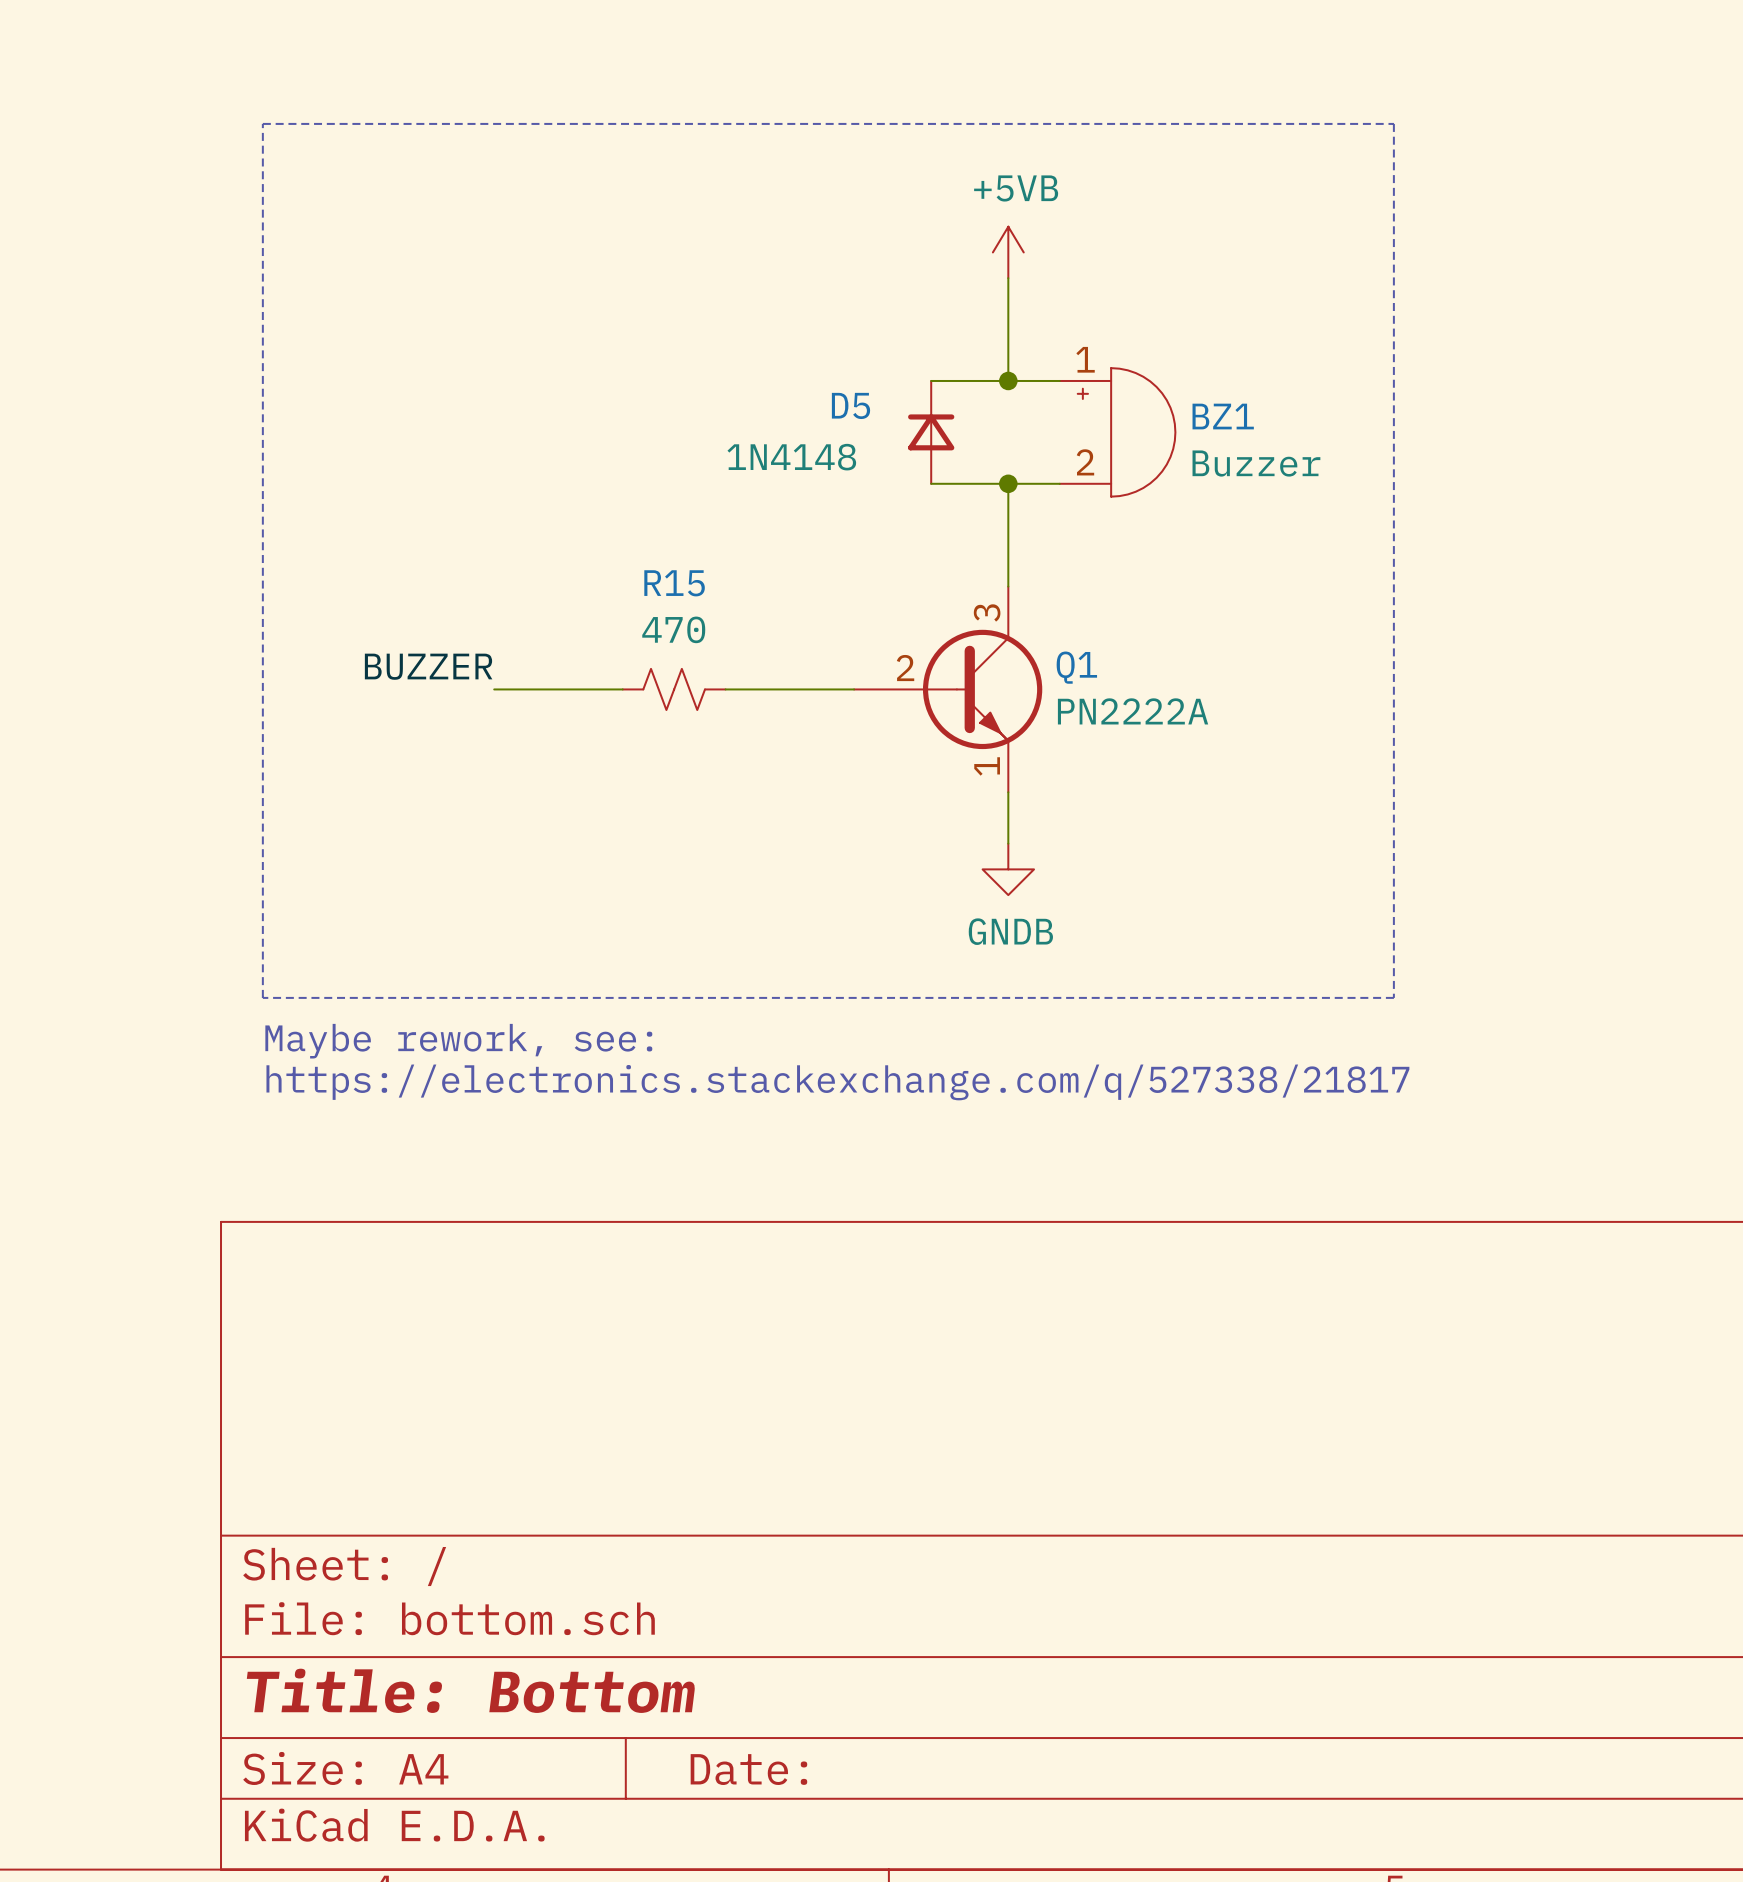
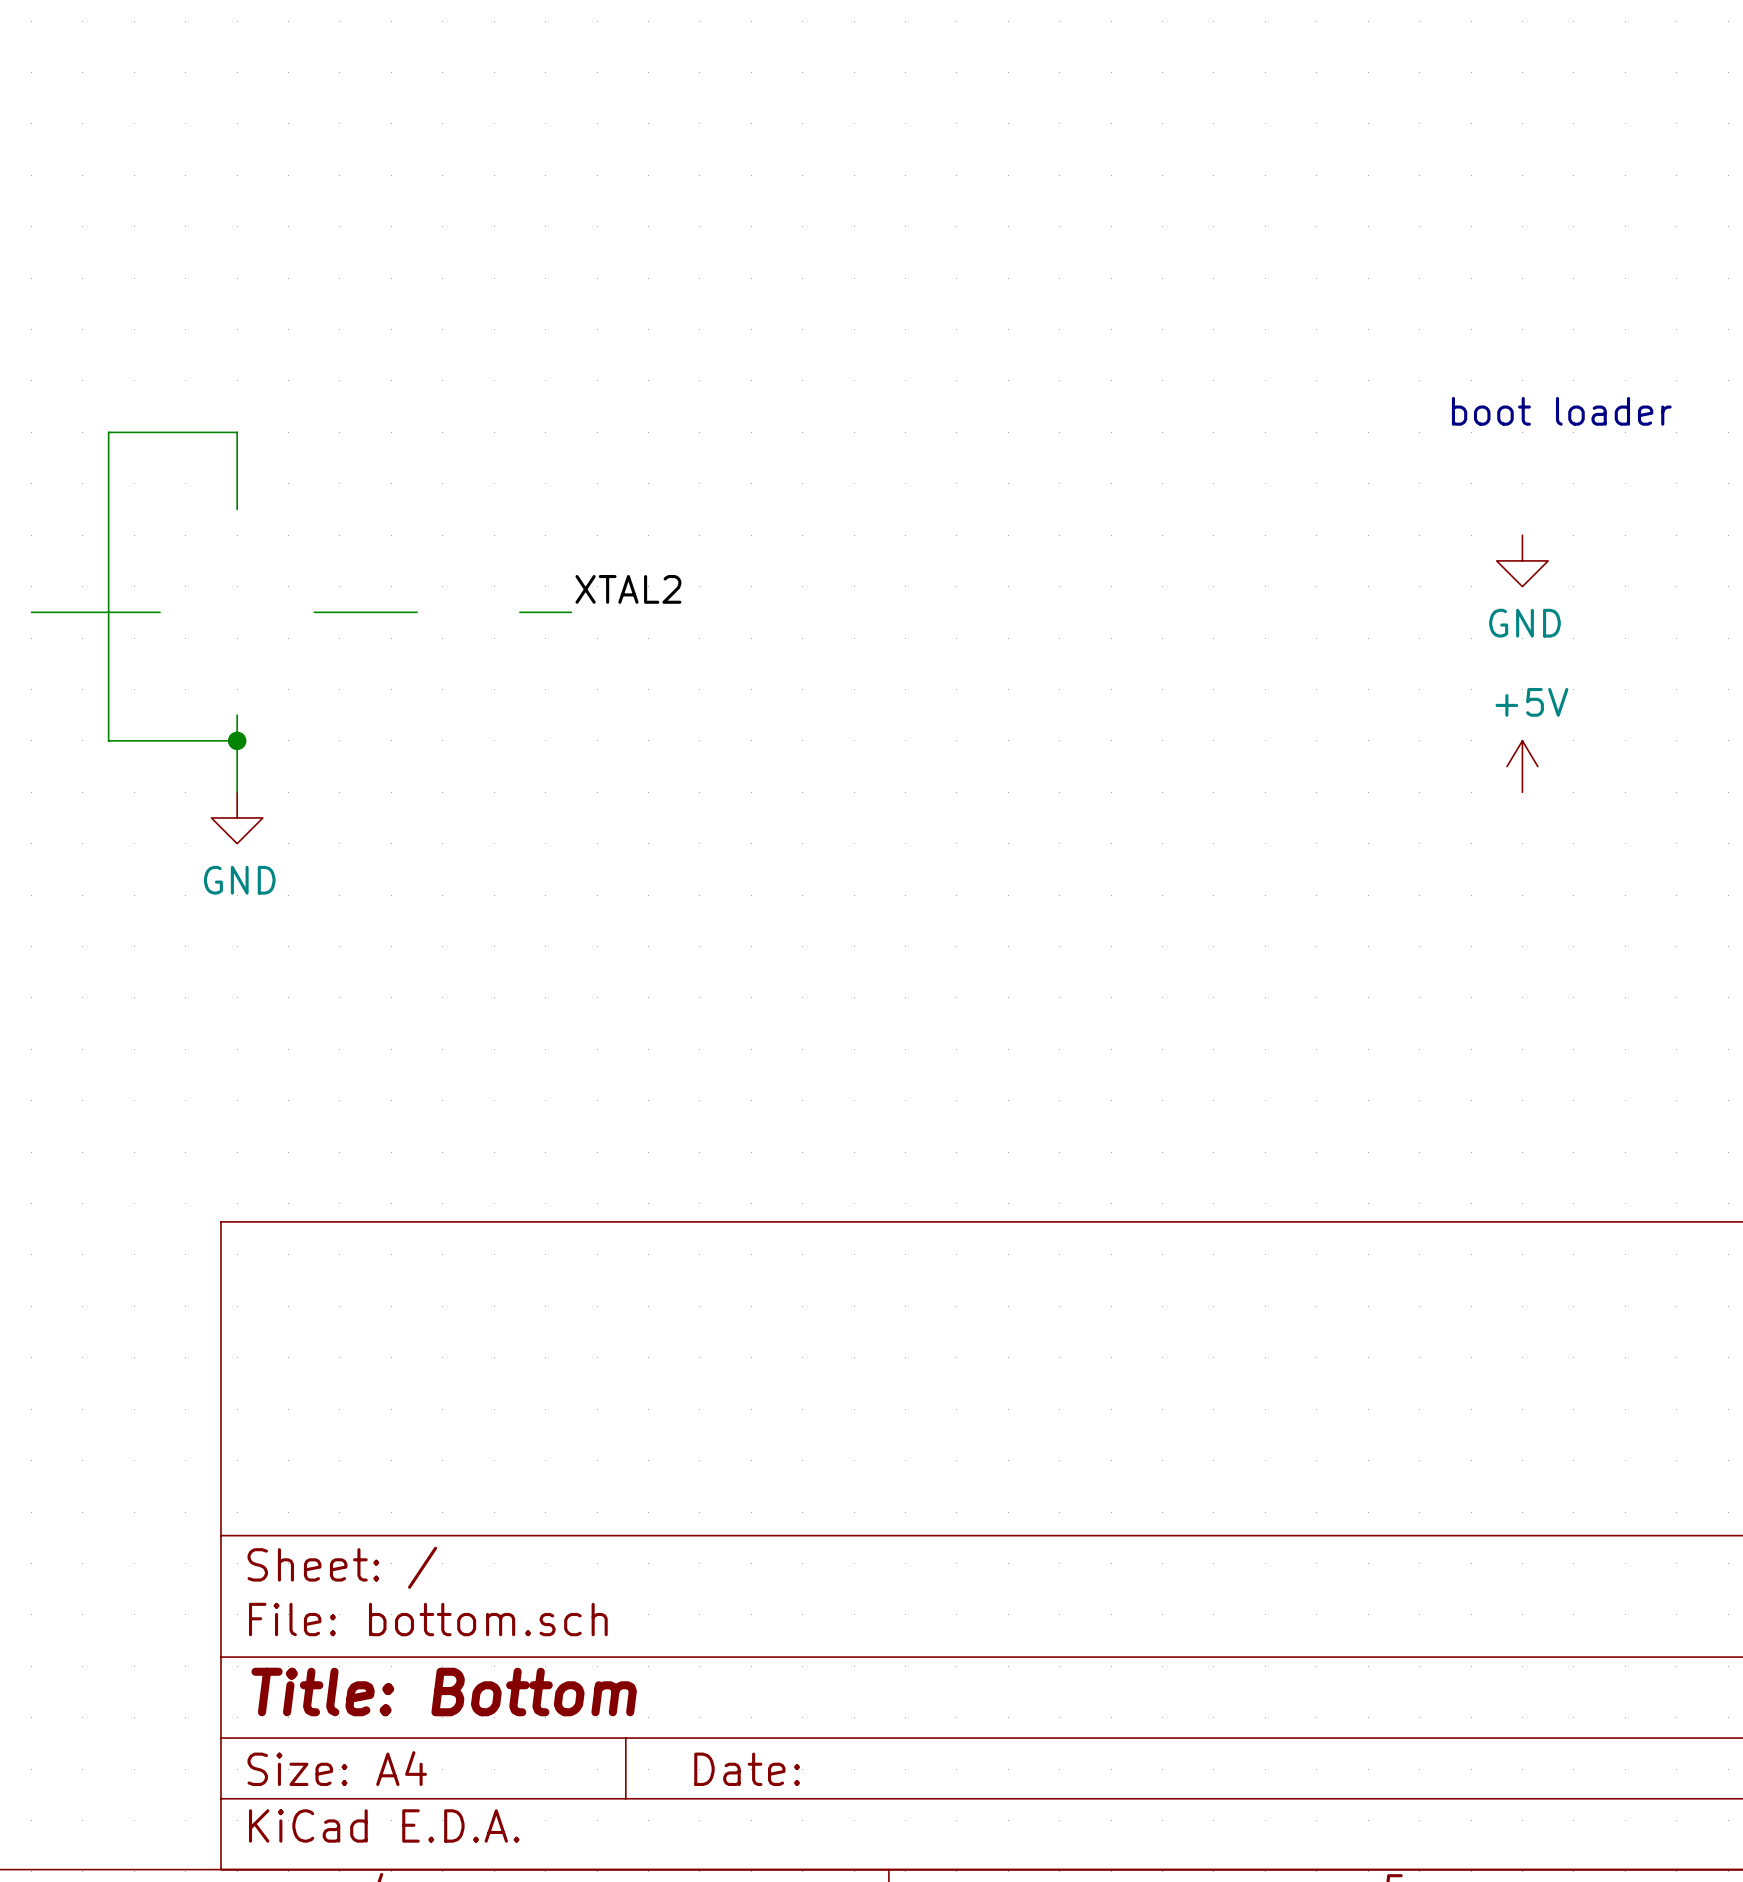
line: (262, 123) (1393, 123) (1393, 997) (262, 997) (262, 123) -> none
power symbol: +5VB (1008, 252) -> none
wire: (1008, 278) (1008, 380) -> none
wire: (931, 380) (1059, 380) -> none
junction: (1008, 380) -> none
text: none -> boot loader (1561, 411)
D5: 1N4148 (931, 432) -> none
BZ1: Buzzer (1117, 432) -> none
wire: (931, 483) (1059, 483) -> none
wire: (1008, 483) (1008, 586) -> none
junction: (1008, 483) -> none
wire: none -> (237, 509) (237, 432) (108, 432) (108, 740) (237, 740)
power symbol: none -> GND (1522, 560)
label: none -> XTAL2 (628, 589)
wire: none -> (314, 612) (417, 612)
wire: none -> (519, 612) (571, 612)
label: BUZZER (428, 666) -> none
wire: (494, 689) (622, 689) -> (31, 612) (160, 612)
R15: 470 (674, 689) -> none
wire: (725, 689) (854, 689) -> none
Q1: PN2222A (948, 689) -> none
wire: none -> (237, 715) (237, 792)
junction: none -> (237, 740)
power symbol: none -> +5V (1522, 766)
wire: (1008, 792) (1008, 843) -> none
power symbol: none -> GND (237, 817)
power symbol: GNDB (1008, 869) -> none
text: Maybe rework, see: (458, 1041) -> none
text: https://electronics.stackexchange.com/q/527338/21817 (837, 1082) -> none

